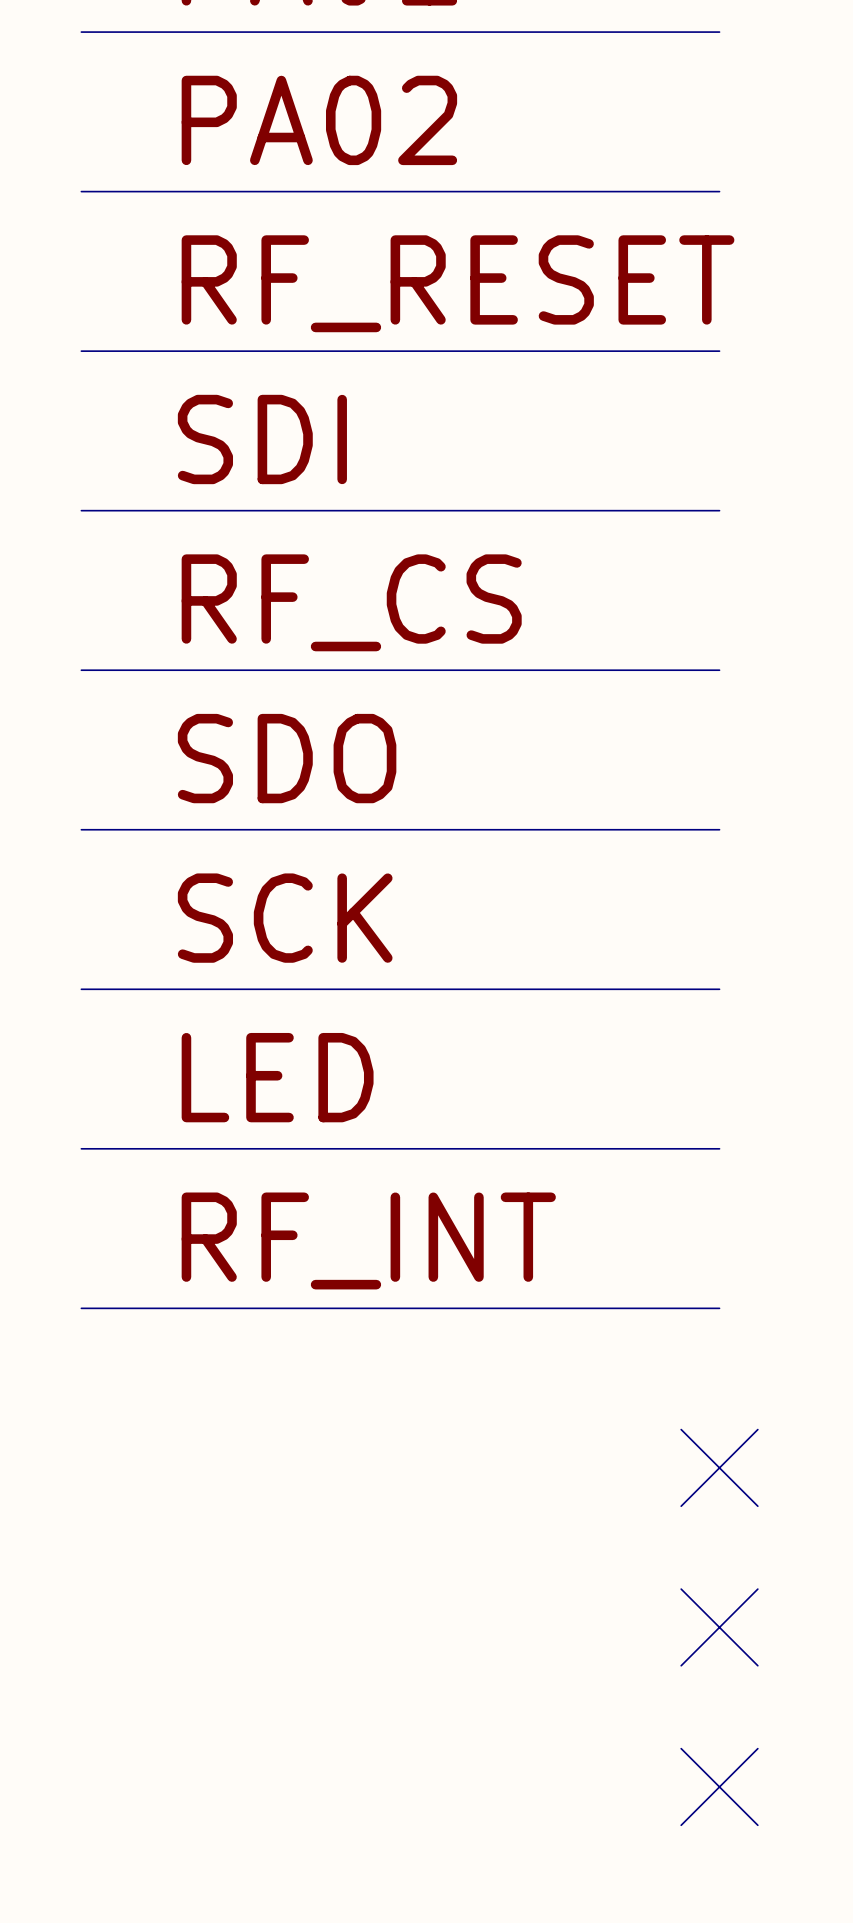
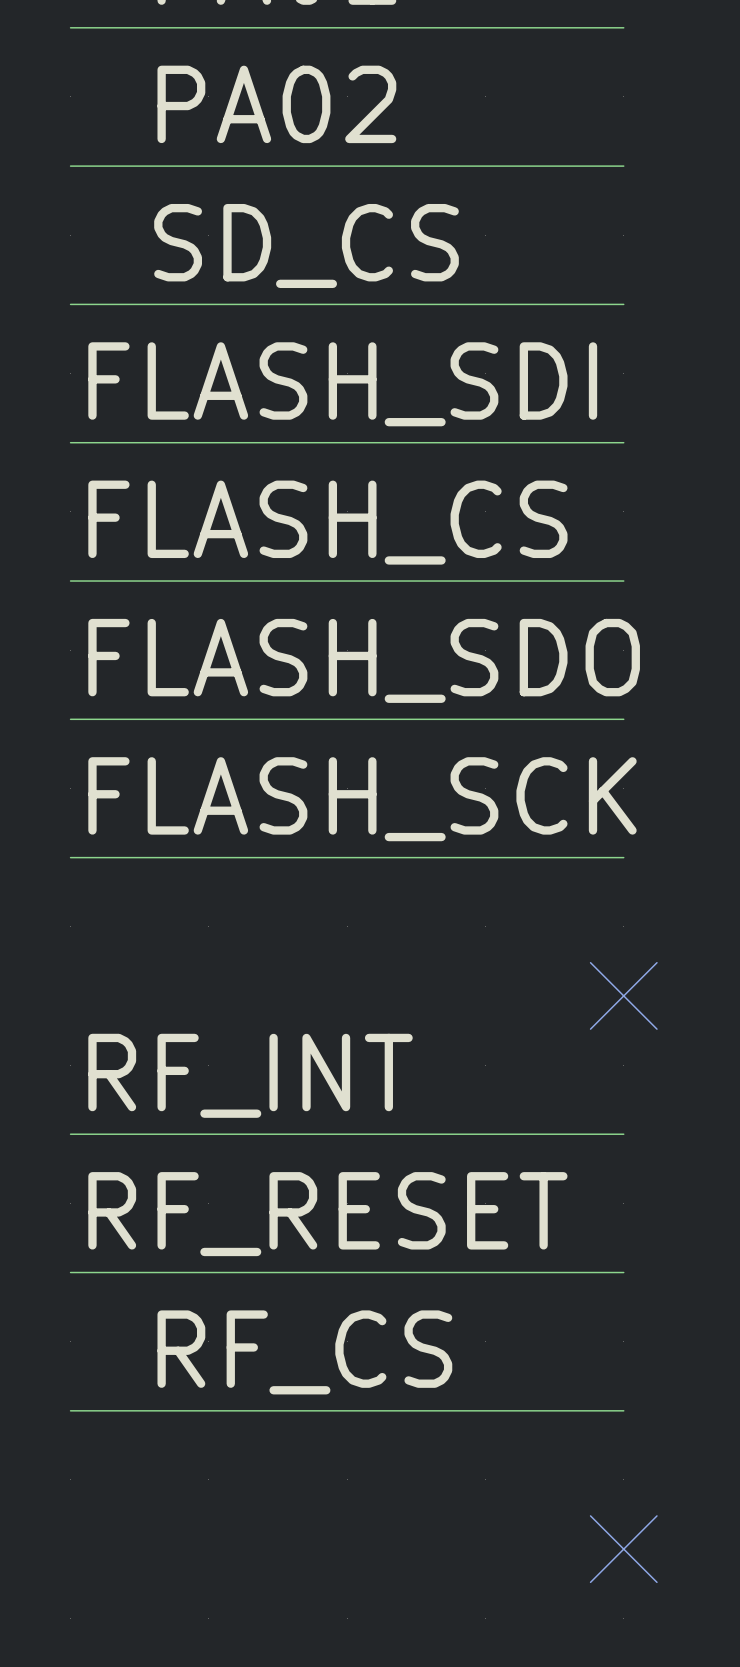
label: RF_RESET (458, 283) -> SD_CS (306, 245)
label: SDI (262, 439) -> none
label: none -> FLASH_SDI (342, 384)
label position: RF_CS (351, 602) -> RF_CS (304, 1352)
label: none -> FLASH_CS (327, 522)
label: SDO (287, 758) -> none
label: none -> FLASH_SDO (364, 660)
label: SCK (285, 918) -> none
label: none -> FLASH_SCK (362, 799)
label: LED (277, 1077) -> none
wire: (81, 1148) (719, 1148) -> (70, 1272) (623, 1272)
no-connect mark: none -> (623, 995)
label position: RF_INT (368, 1240) -> RF_INT (250, 1075)
label: none -> RF_RESET (327, 1214)
no-connect mark: (719, 1467) -> none
wire: none -> (70, 1410) (623, 1410)
no-connect mark: (719, 1627) -> none

